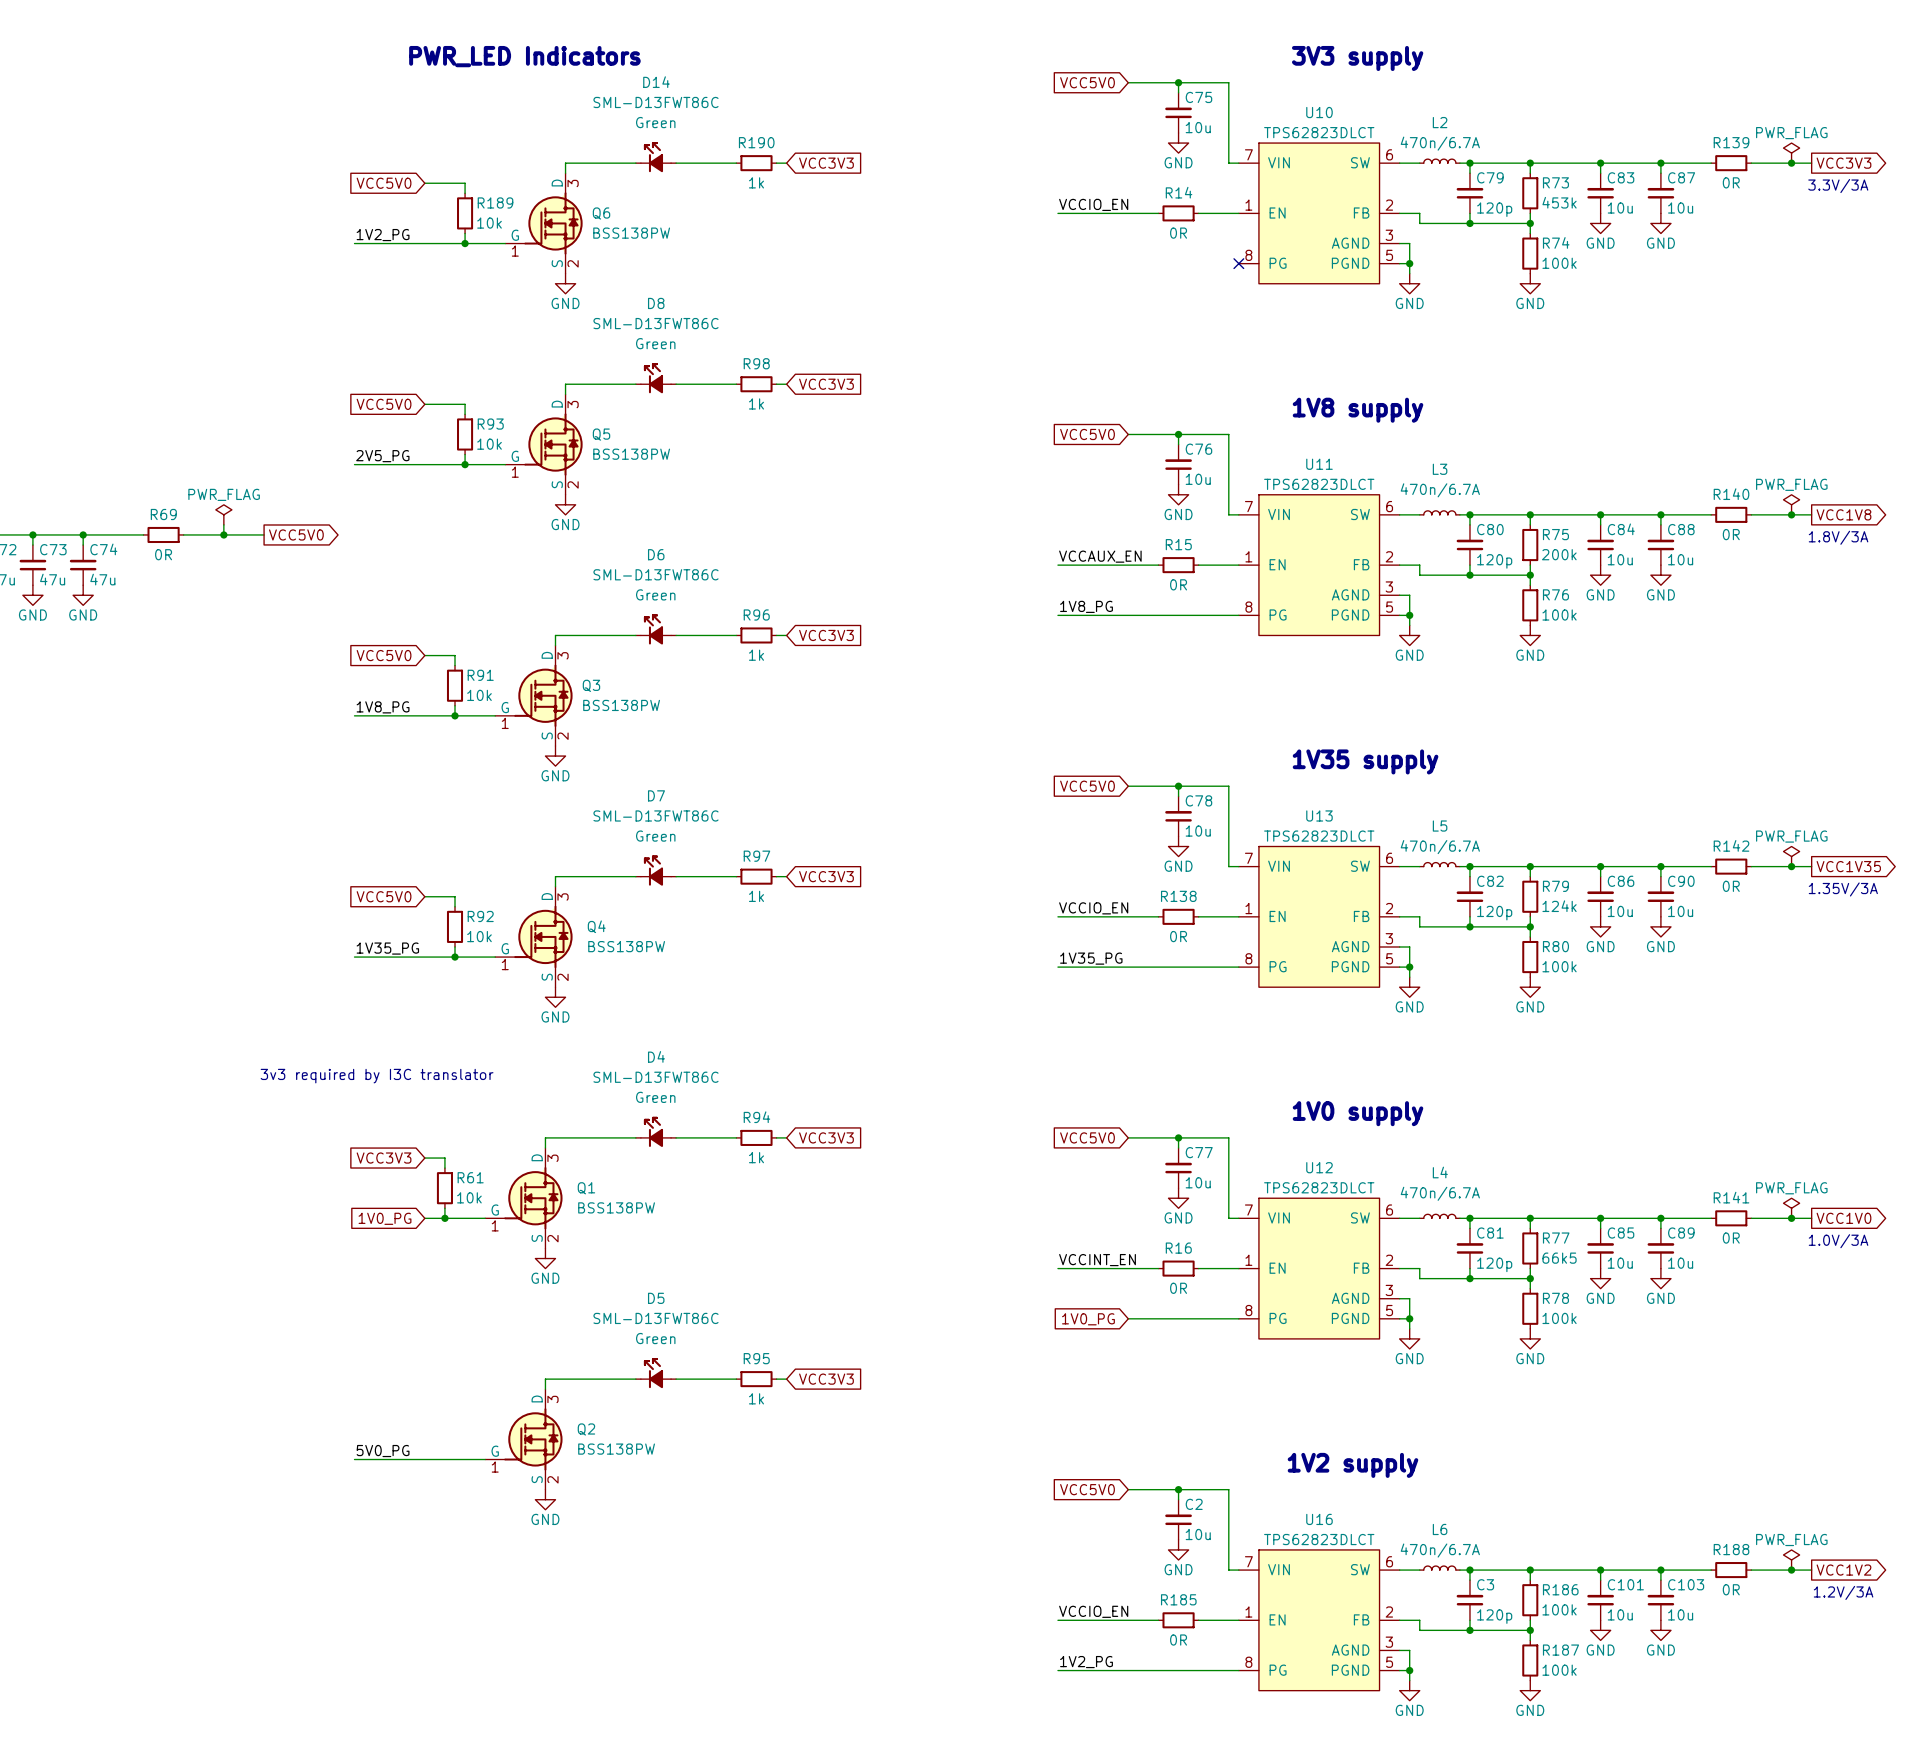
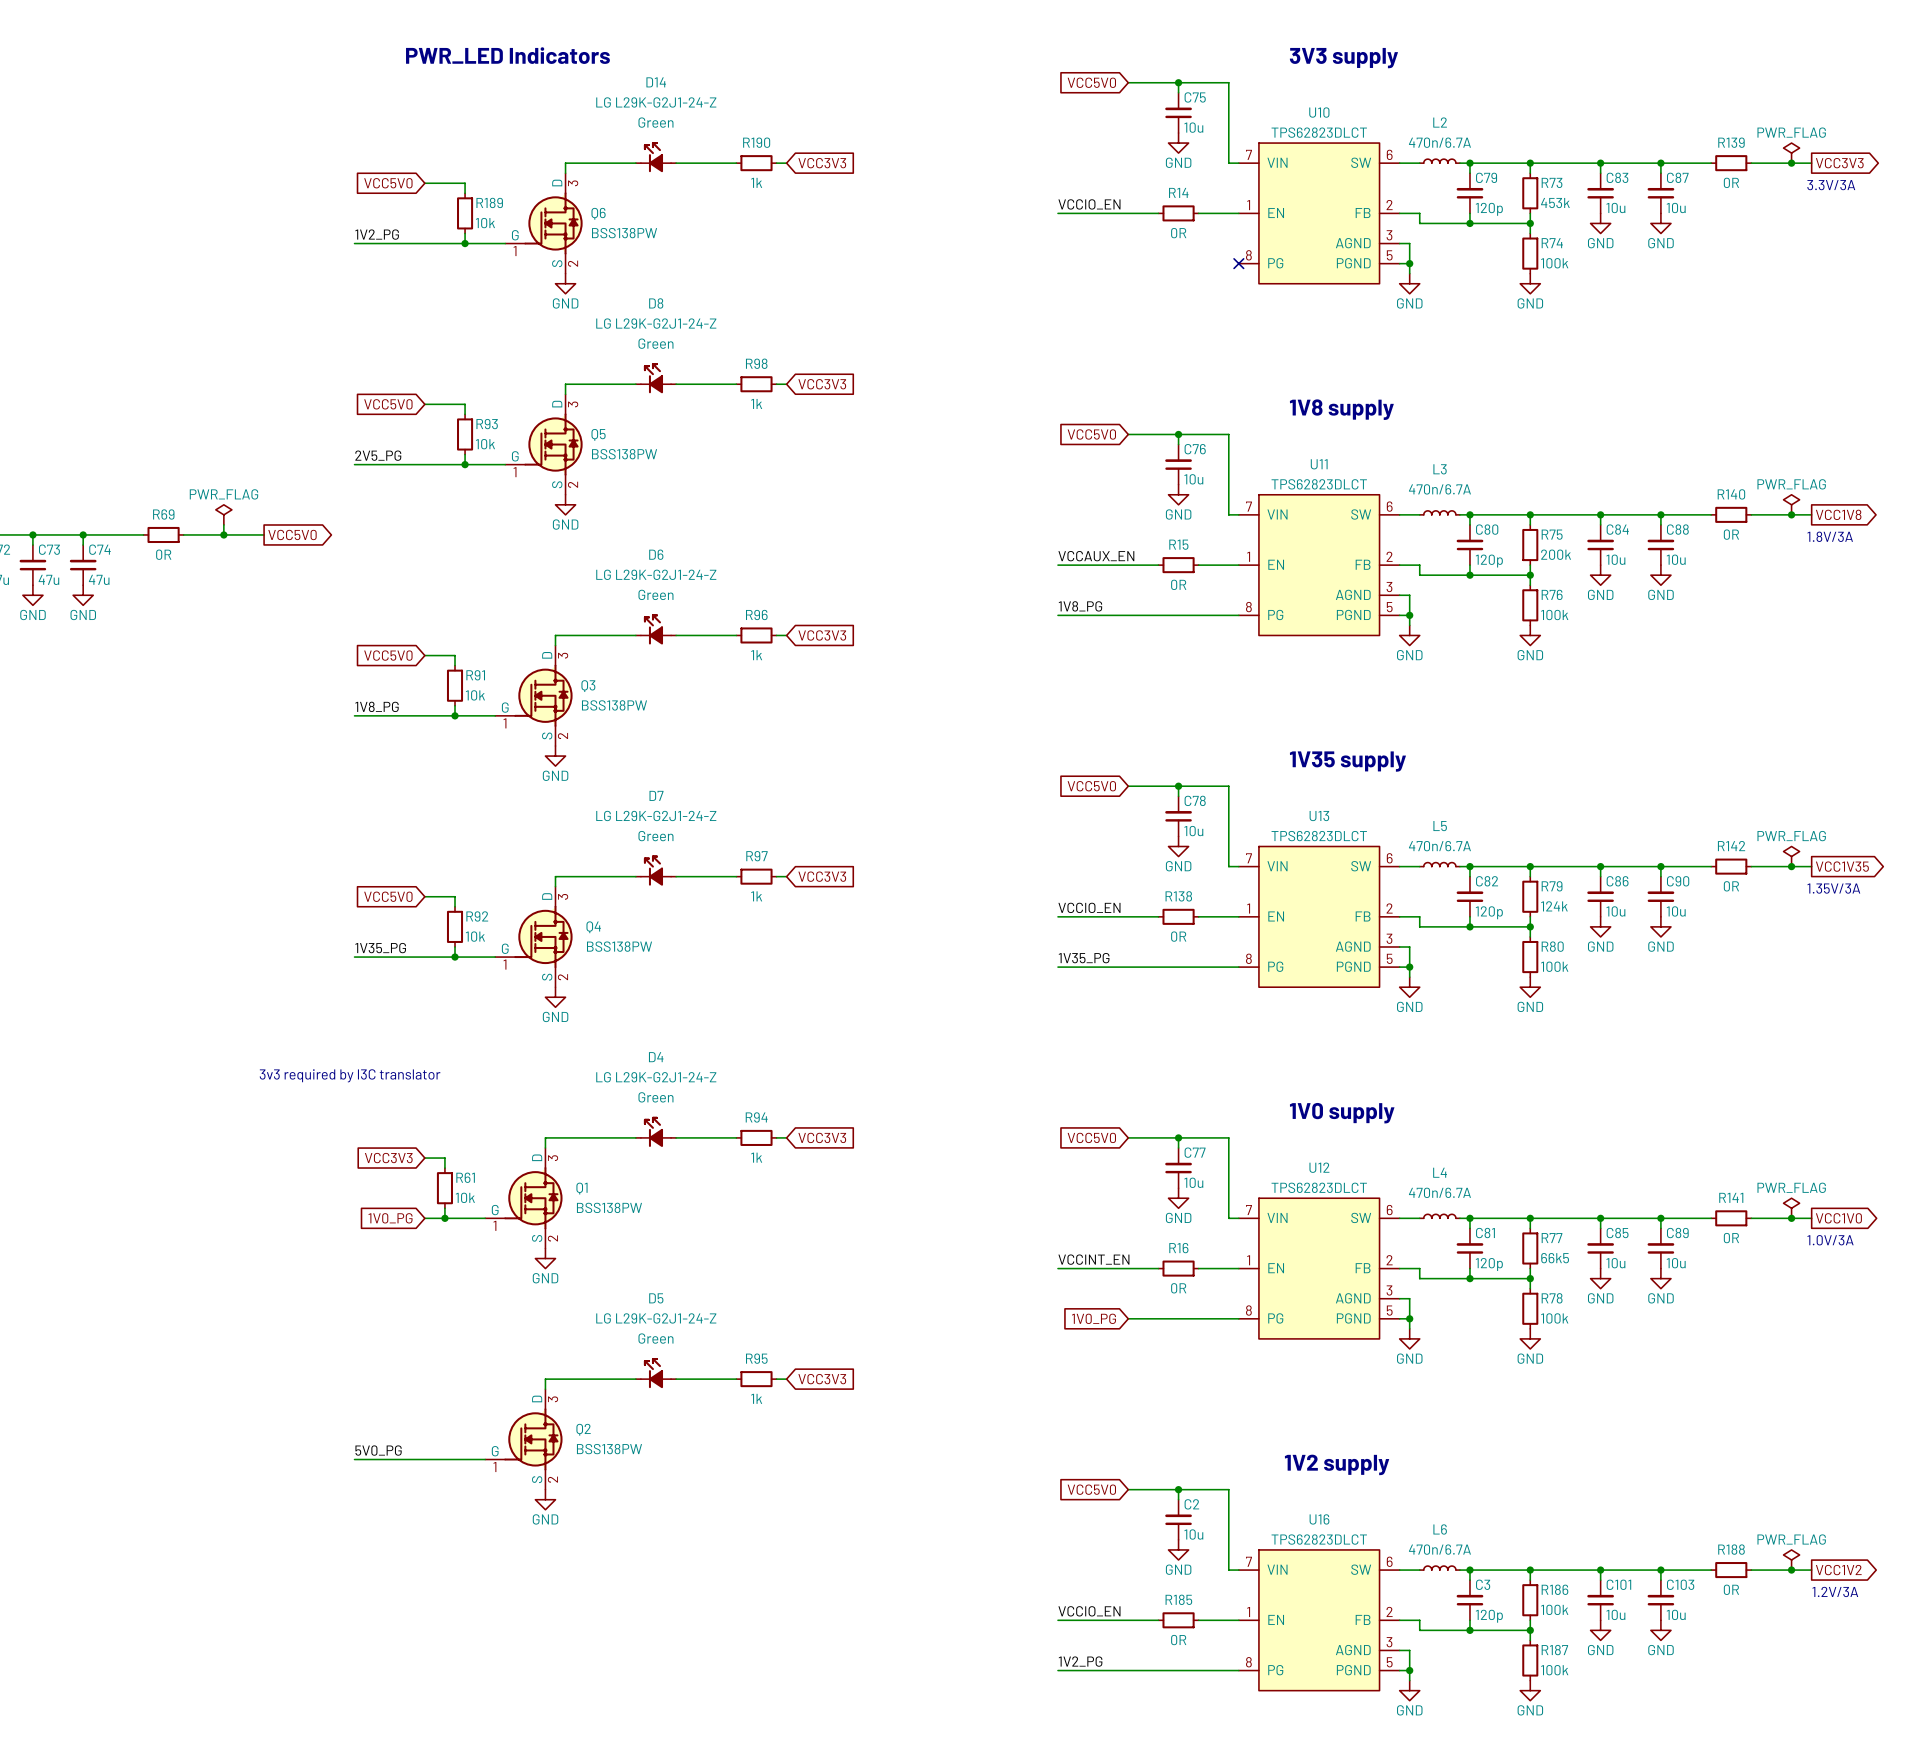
D14 text: SML-D13FWT86C (655, 102) -> LG L29K-G2J1-24-Z (656, 102)
D8 text: SML-D13FWT86C (655, 323) -> LG L29K-G2J1-24-Z (656, 323)
D6 text: SML-D13FWT86C (655, 574) -> LG L29K-G2J1-24-Z (656, 574)
D7 text: SML-D13FWT86C (655, 815) -> LG L29K-G2J1-24-Z (656, 815)
D4 text: SML-D13FWT86C (655, 1077) -> LG L29K-G2J1-24-Z (656, 1077)
D5 text: SML-D13FWT86C (655, 1318) -> LG L29K-G2J1-24-Z (656, 1318)

